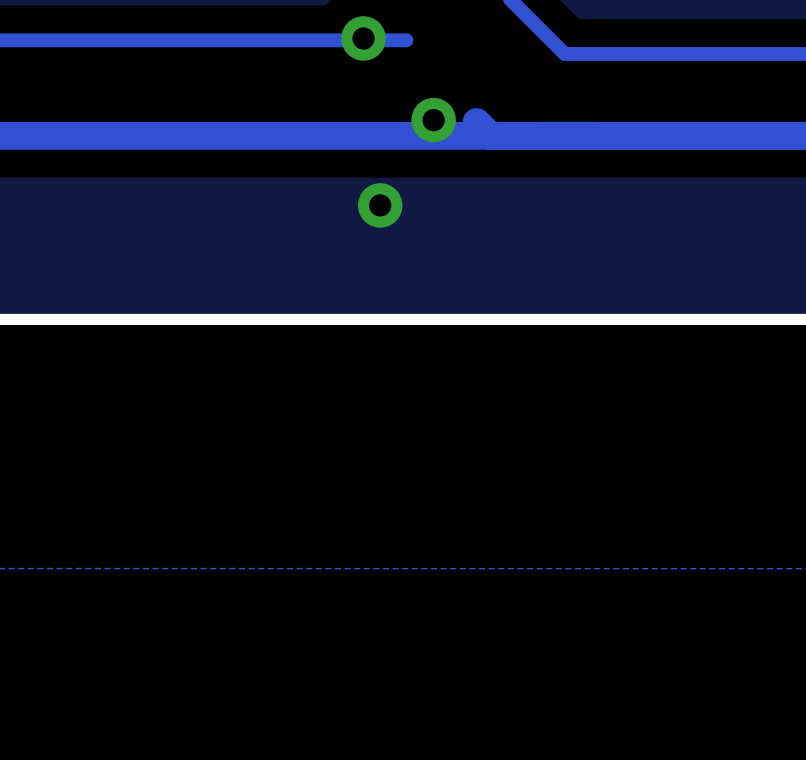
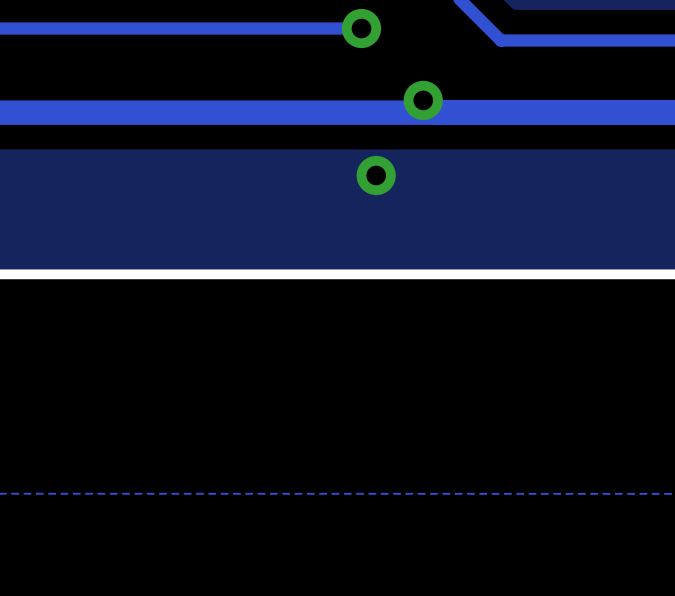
via position: (363, 38) -> (361, 28)
via position: (433, 120) -> (423, 100)
via position: (380, 205) -> (376, 175)

